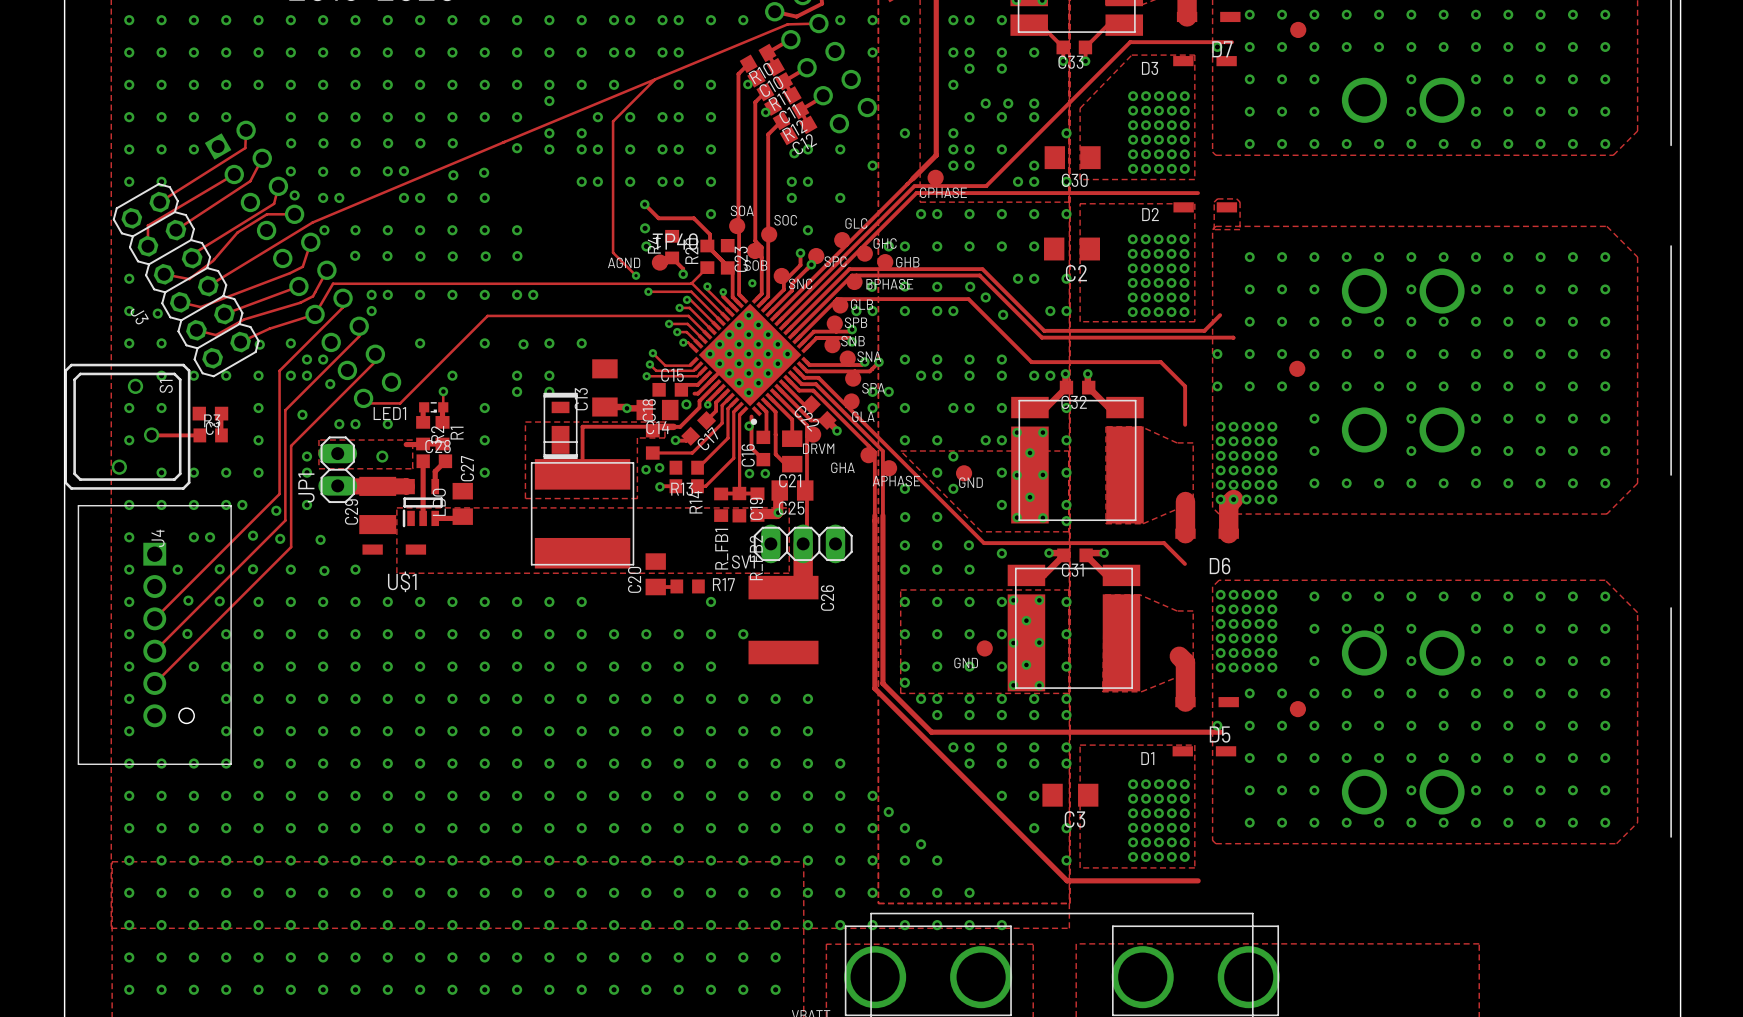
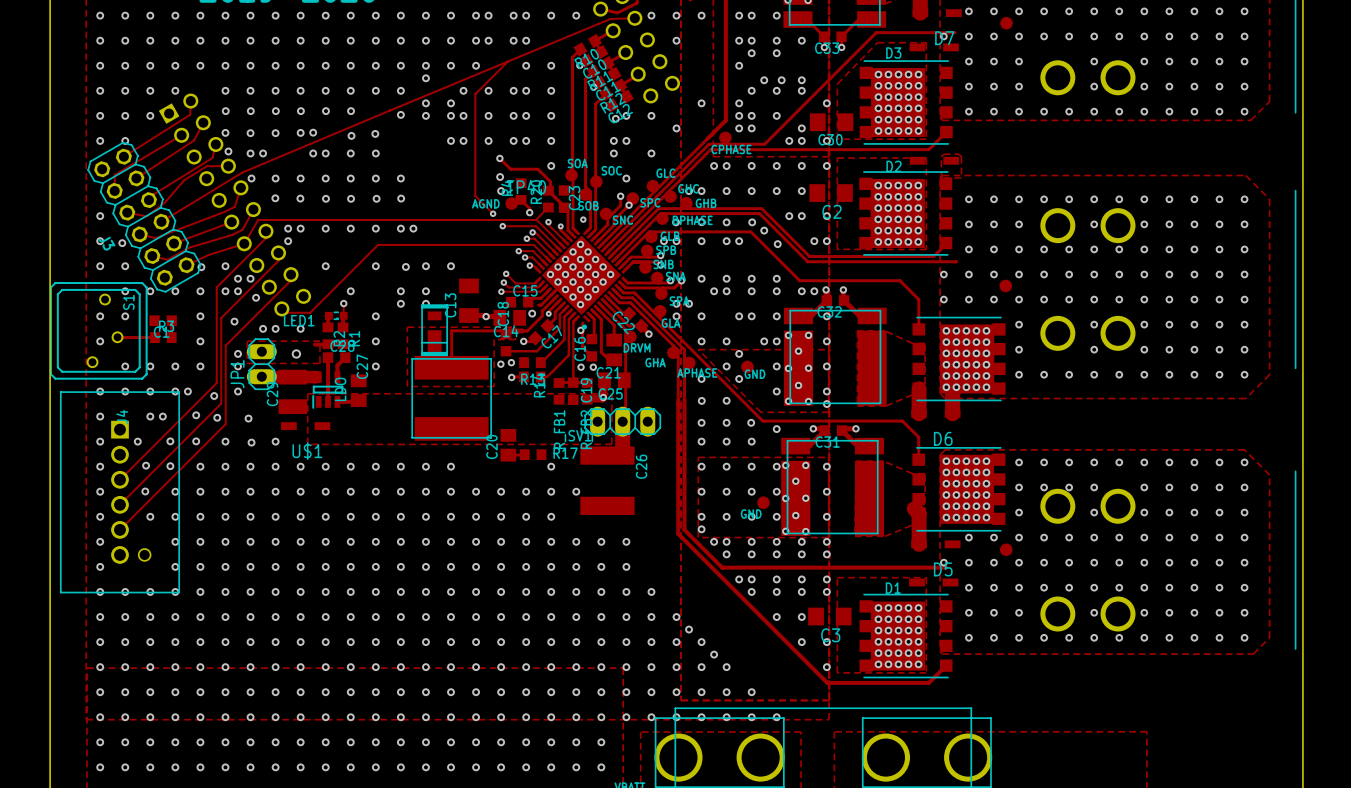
part: none -> (906, 102)
track: none -> (946, 132) (928, 149)
part: none -> (905, 213)
part: none -> (959, 358)
track: none -> (918, 437) (918, 459) (916, 459)
part: none -> (958, 489)
part: none -> (906, 636)
track: none -> (942, 669) (946, 665) (928, 682)

